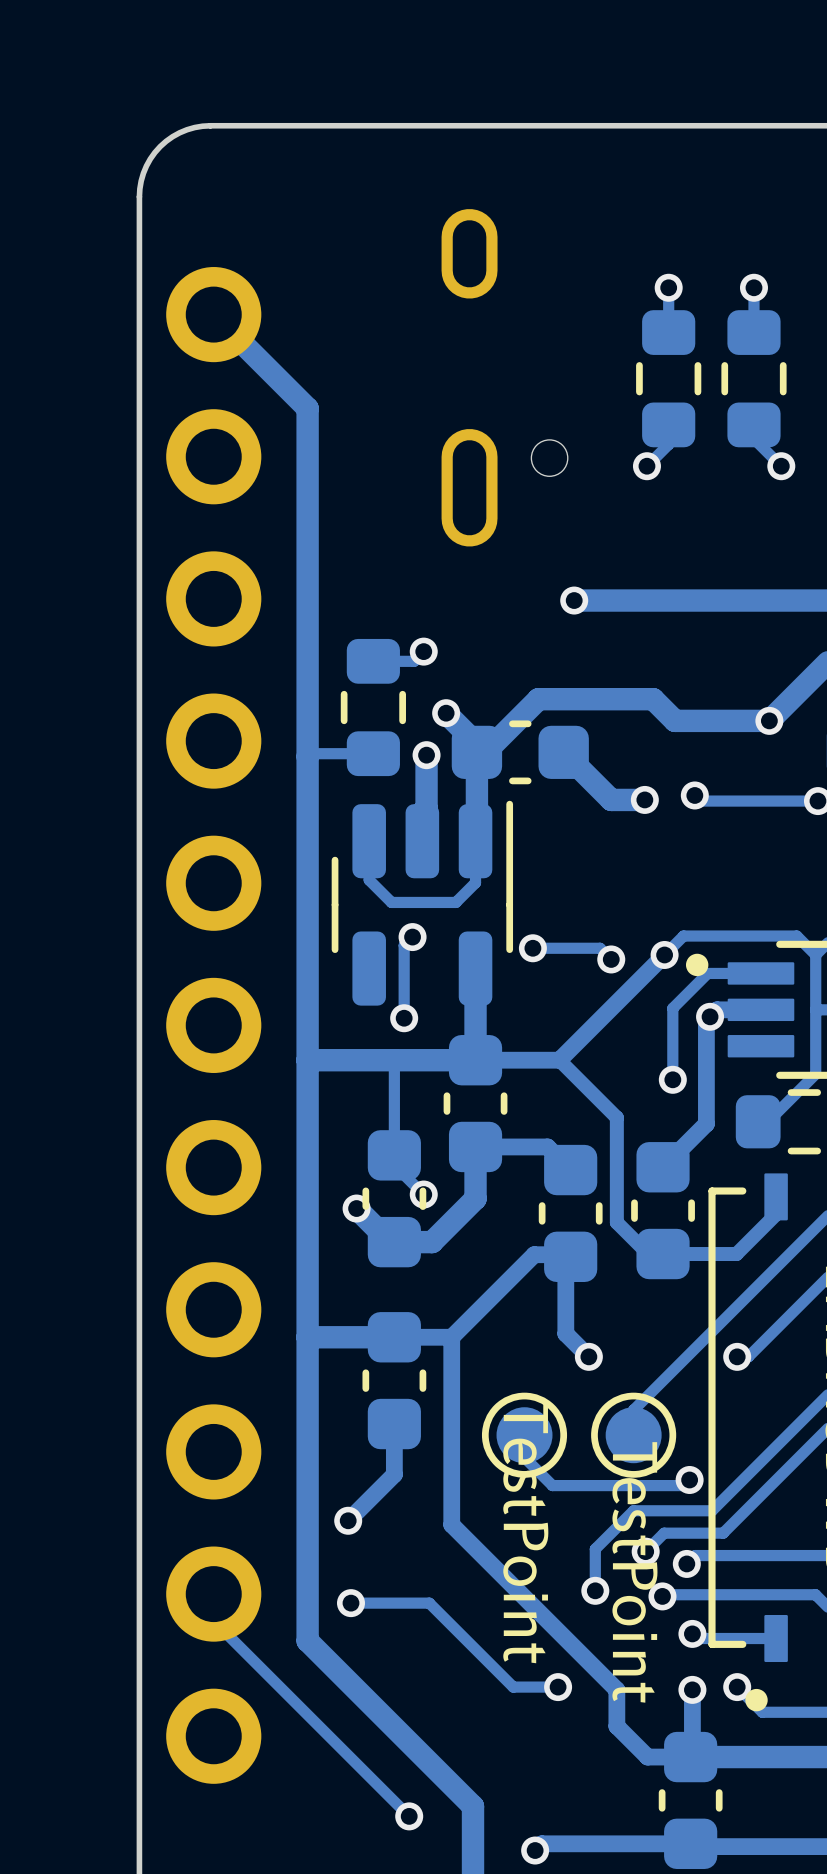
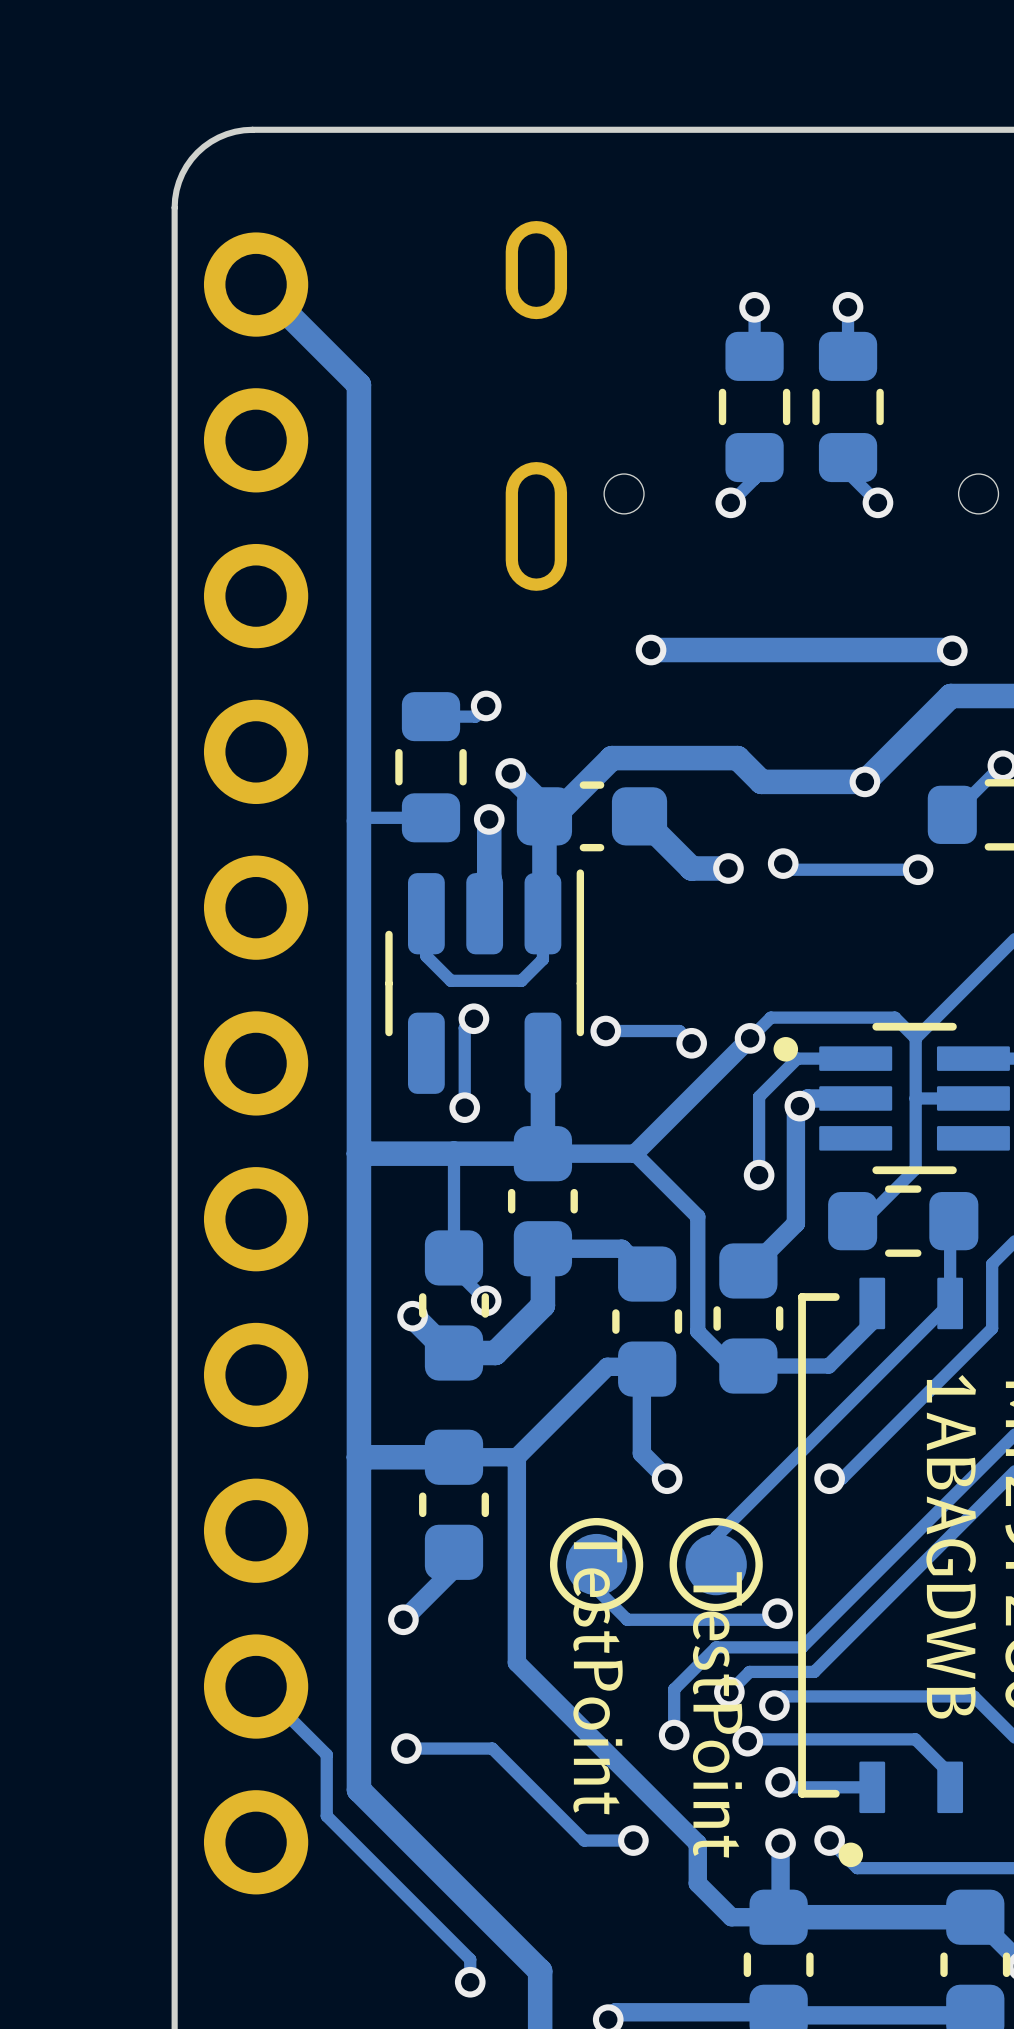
track: (213, 314) (307, 408) -> (258, 284) (358, 384) (358, 439)
part position: (213, 1025) -> (256, 1063)
track: (394, 1439) (394, 1474) (348, 1520) -> (454, 1569) (403, 1619)
via position: (348, 1520) -> (403, 1619)
track: (213, 1594) (213, 1620) (409, 1816) -> (258, 1686) (326, 1754) (326, 1816) (470, 1959) (470, 1982)

